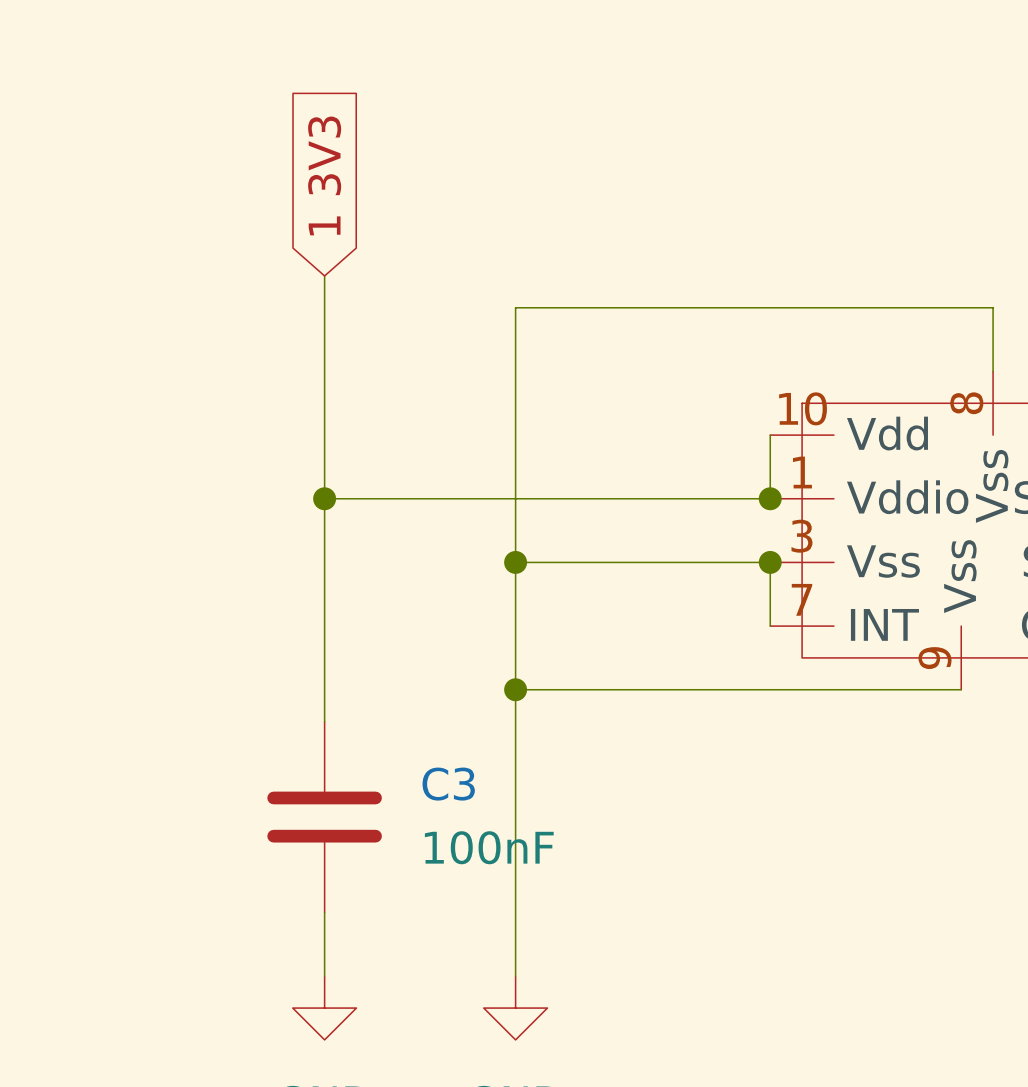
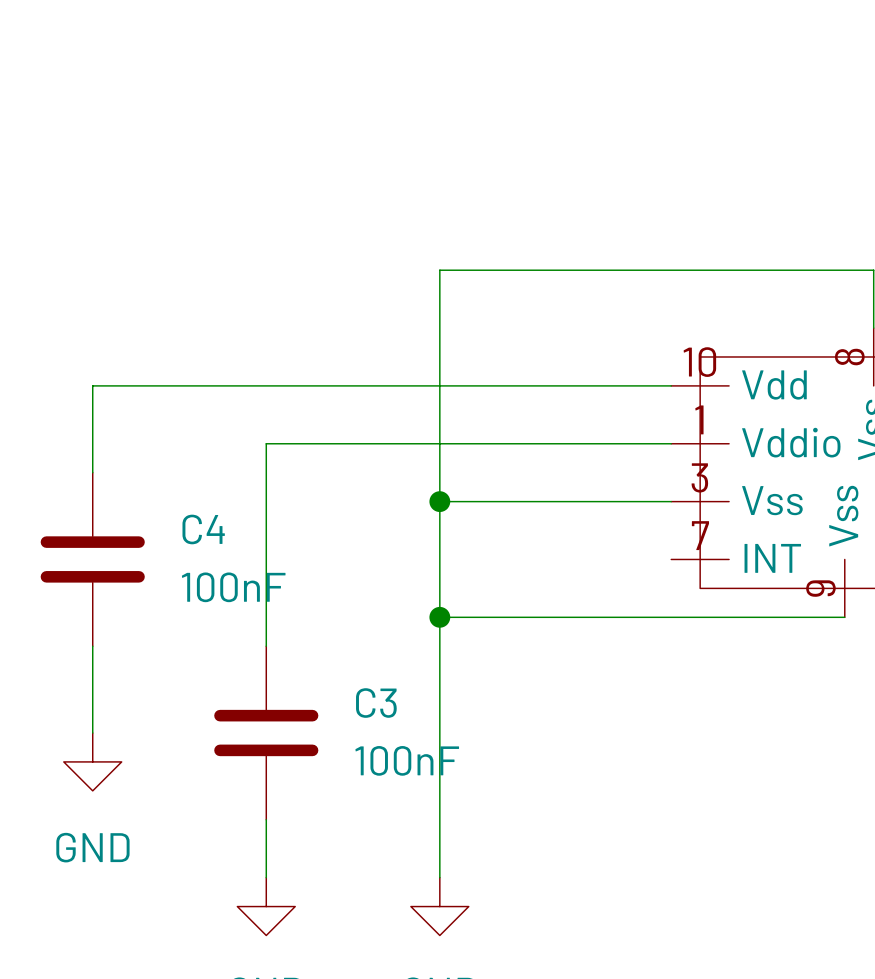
global label: 1 3V3 (324, 175) -> none
wire: (324, 275) (324, 498) -> none
wire: (770, 435) (770, 498) -> (671, 385) (92, 385) (92, 472)
junction: (324, 498) -> none
junction: (770, 498) -> none
wire: (770, 562) (770, 626) -> none
junction: (770, 562) -> none
C4: none -> 100nF (92, 559)
wire: none -> (92, 646) (92, 733)
power symbol: none -> GND (92, 761)

